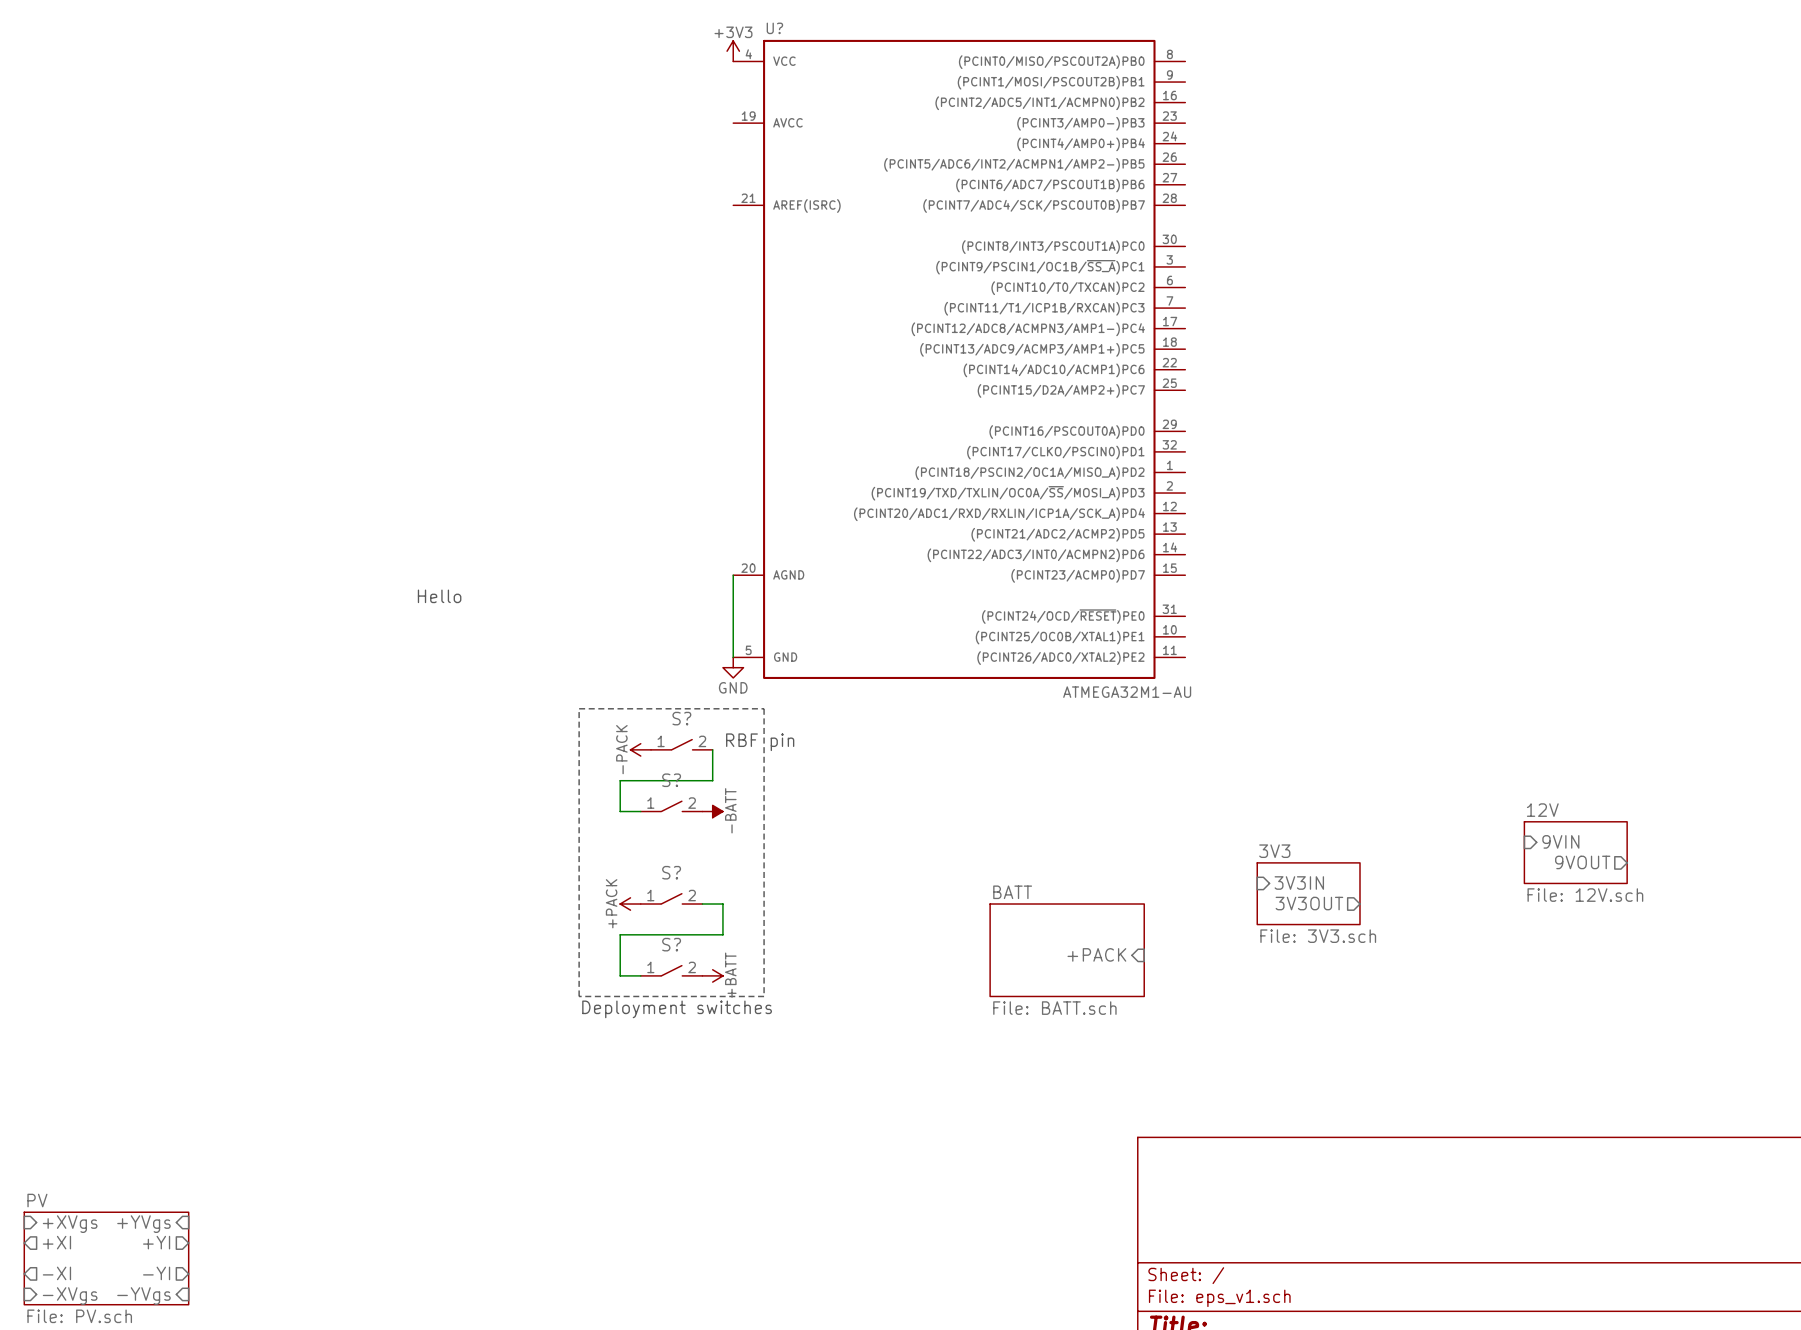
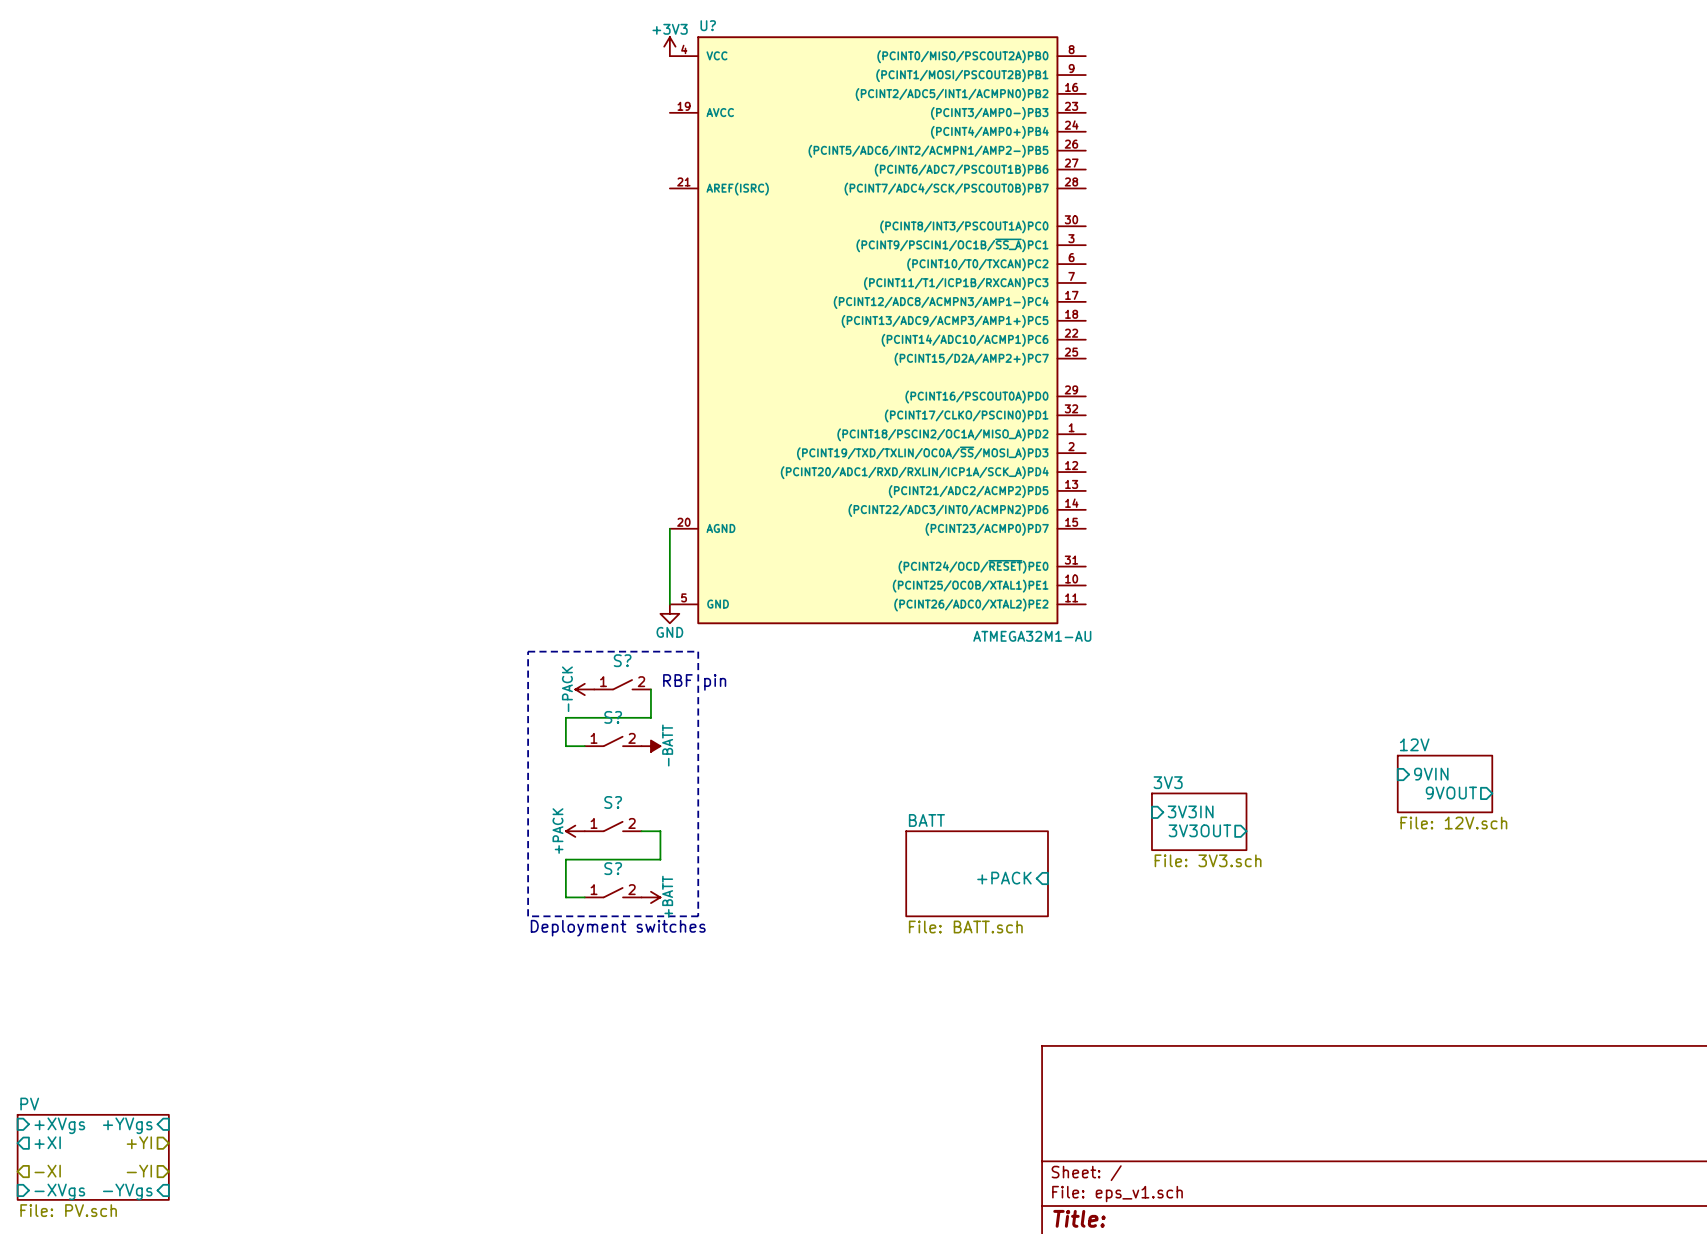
text: Hello (439, 596) -> none

